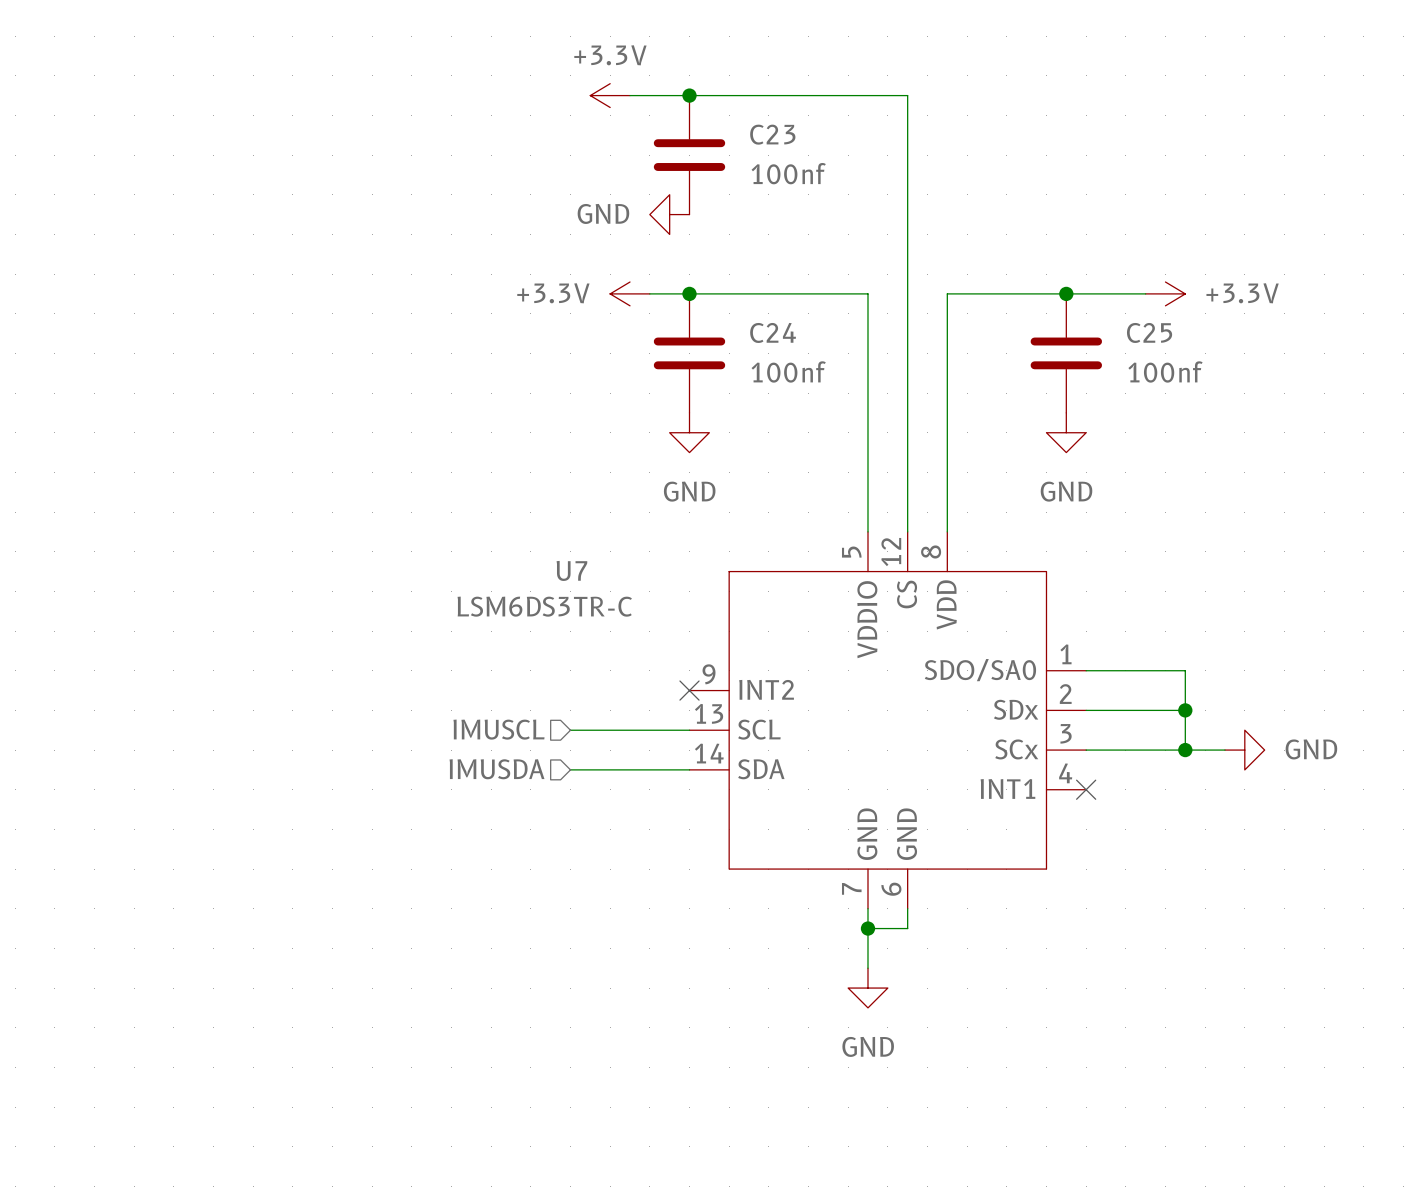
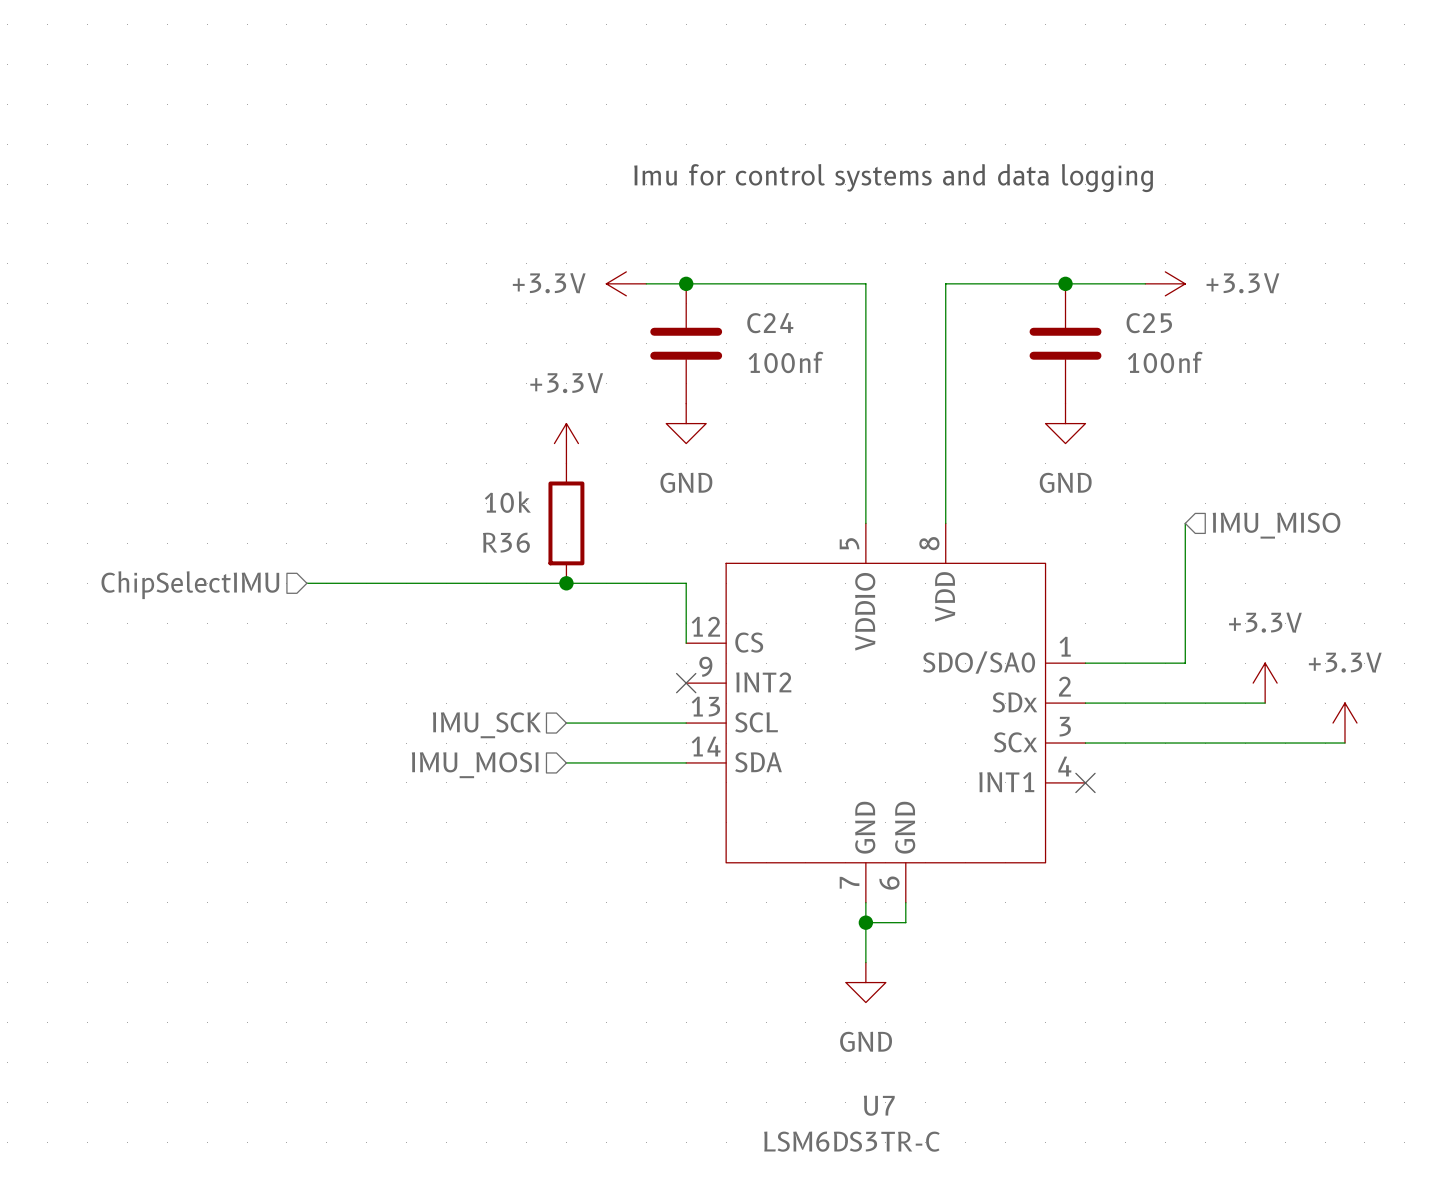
power symbol rotation: 0° (610, 95) -> 90° clockwise (566, 443)
power symbol position: +3.3V (610, 95) -> +3.3V (566, 443)
wire: (630, 95) (907, 95) (907, 531) -> none
junction: (689, 95) -> none
C23: 100nf (689, 155) -> none
text: none -> Imu for control systems and data logging (893, 178)
power symbol: GND (669, 214) -> none
R36: none -> 10k (566, 523)
U7 symbol: [689, 531, 1087, 909] -> [686, 523, 1086, 903]
hierarchical label: none -> IMU_MISO (1276, 525)
U7 name position: U7 (571, 570) -> U7 (879, 1105)
wire: none -> (306, 583) (686, 583) (686, 643)
junction: none -> (566, 583)
hierarchical label: none -> ChipSelectIMU (190, 585)
U7 value position: LSM6DS3TR-C (544, 606) -> LSM6DS3TR-C (851, 1141)
wire: (1185, 670) (1185, 750) -> (1185, 663) (1185, 523)
power symbol: none -> +3.3V (1265, 683)
wire: none -> (1185, 703) (1265, 703)
junction: (1185, 710) -> none
hierarchical label: IMUSCL (499, 729) -> IMU_SCK (486, 725)
power symbol: none -> +3.3V (1344, 723)
junction: (1185, 750) -> none
wire: none -> (1225, 743) (1344, 743)
power symbol: GND (1244, 750) -> none
hierarchical label: IMUSDA (497, 769) -> IMU_MOSI (475, 765)

